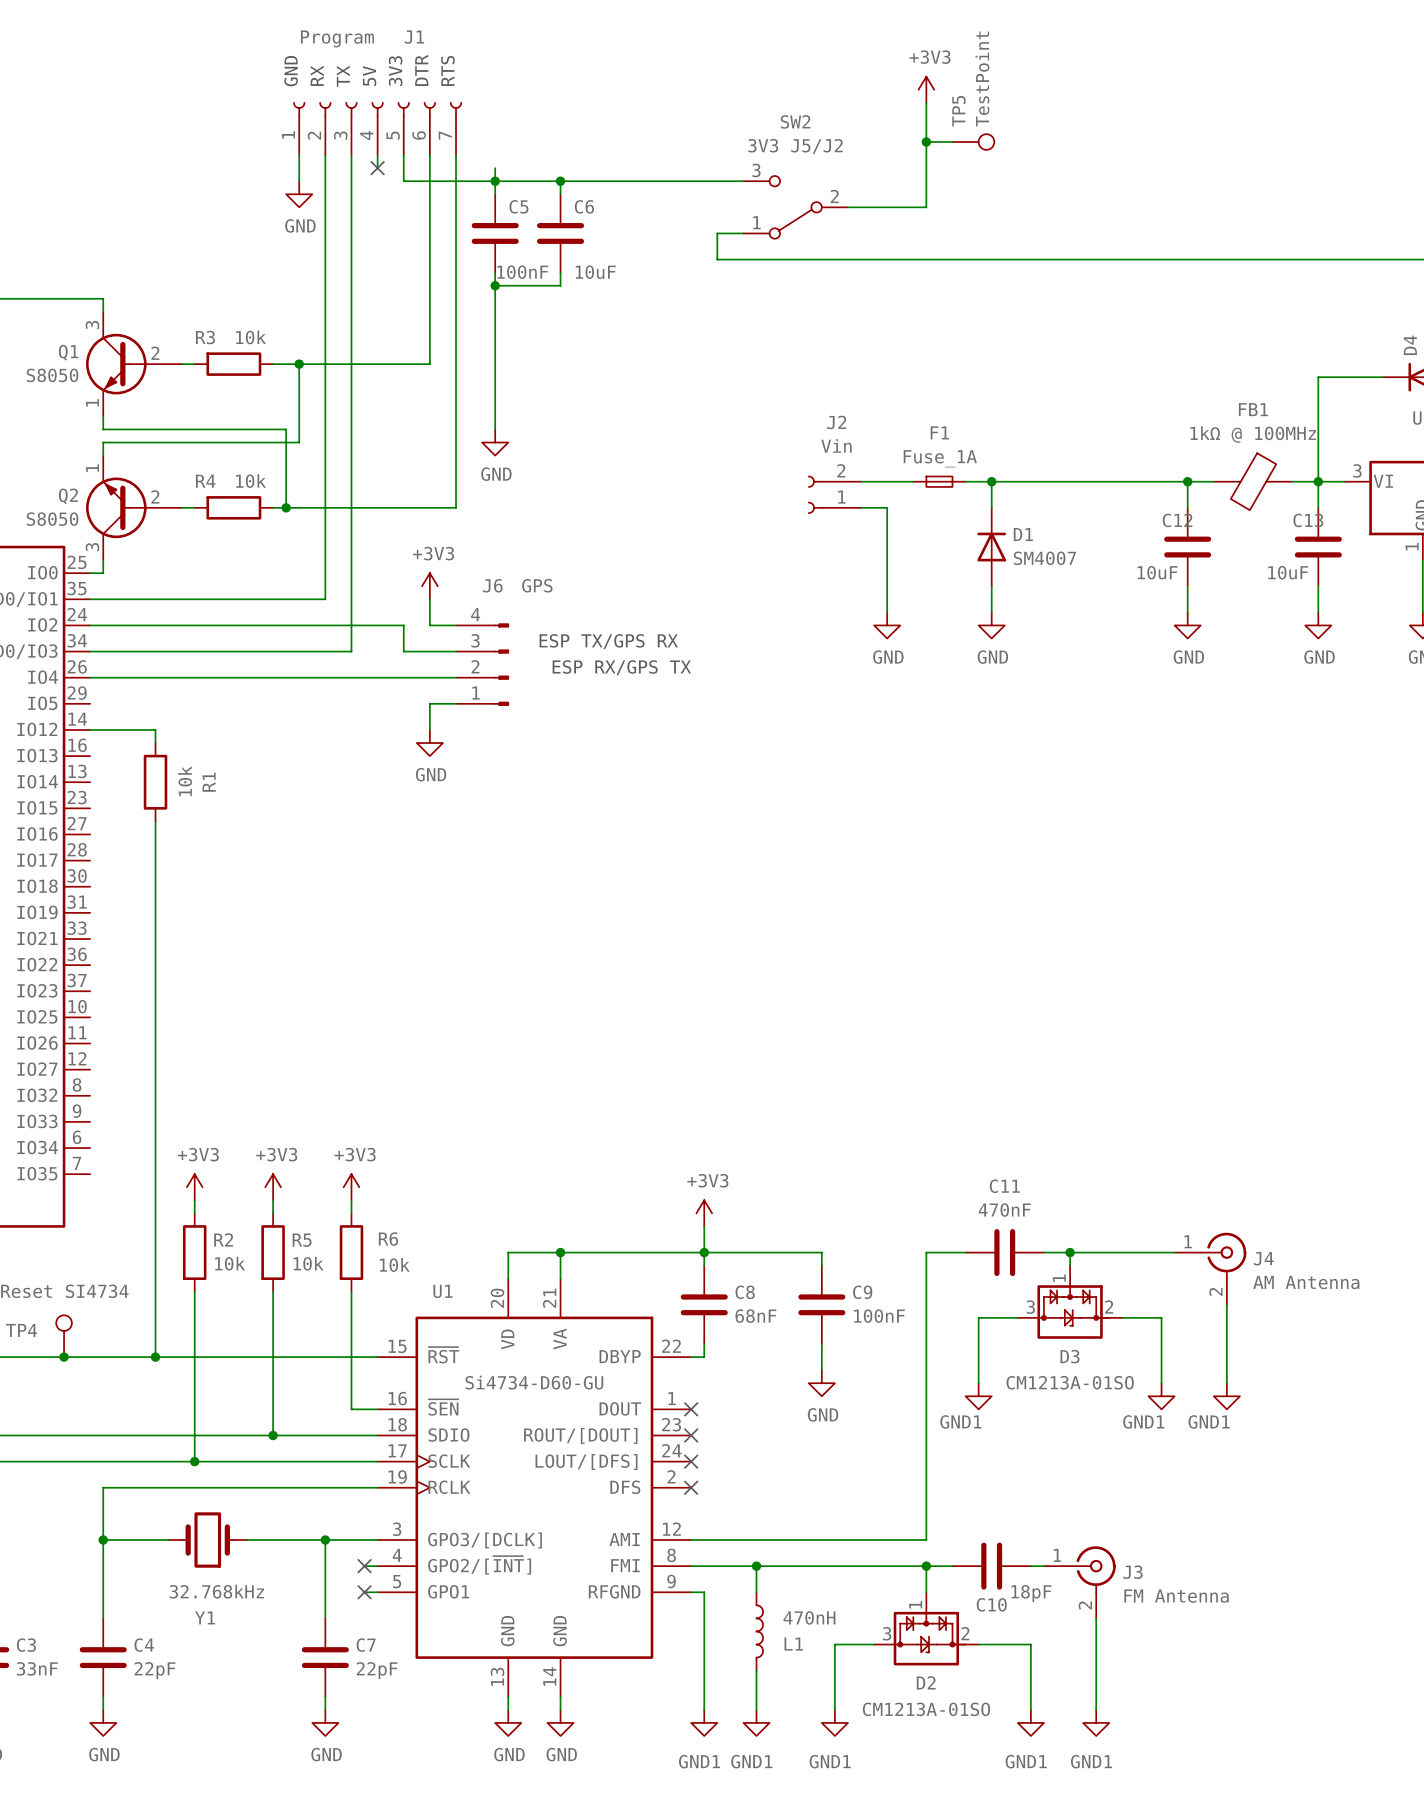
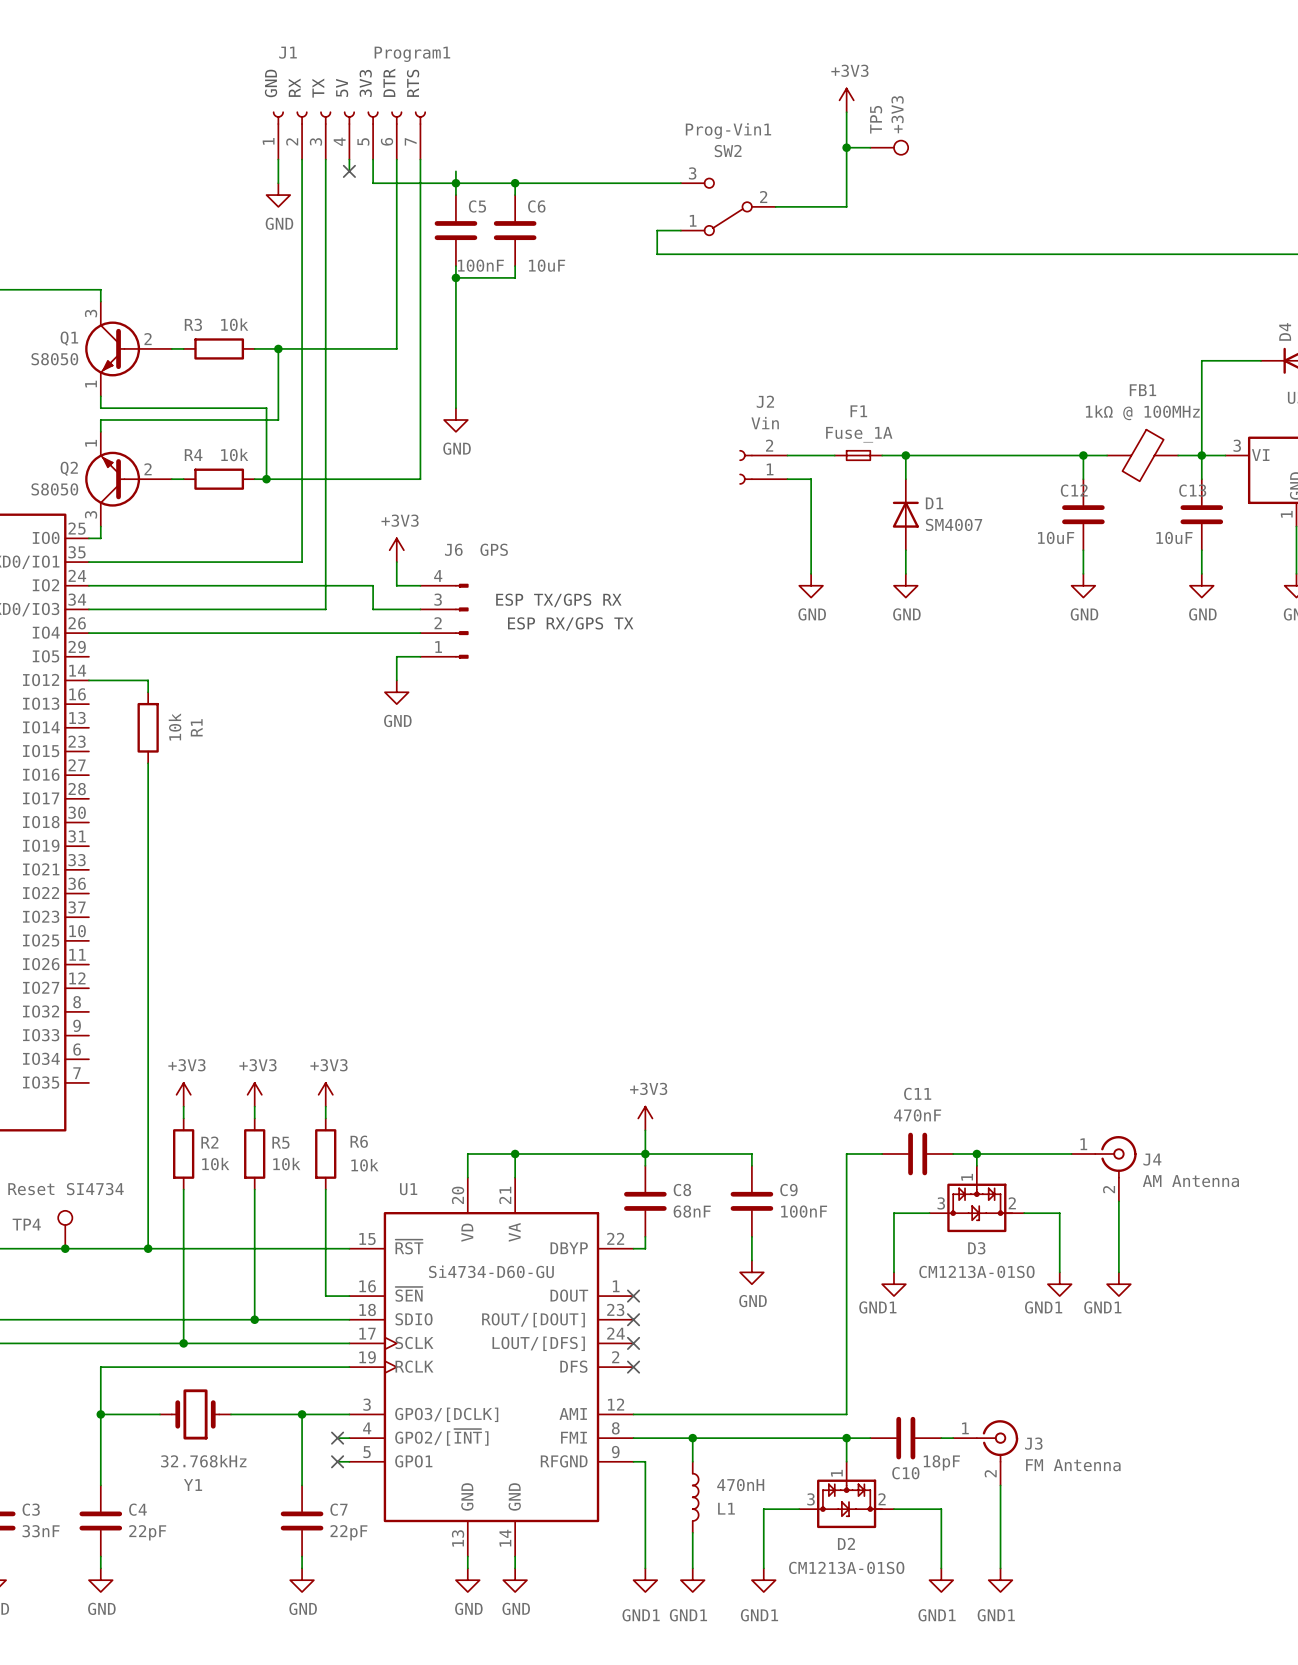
J1 name: J1 (414, 37) -> Program1 (412, 54)
J1 value: Program (337, 38) -> J1 (288, 52)
TP5 value: TestPoint (982, 78) -> +3V3 (897, 114)
SW2 name: SW2 (795, 121) -> Prog-Vin1 (728, 131)
SW2 value: 3V3 J5/J2 (795, 146) -> SW2 (728, 151)

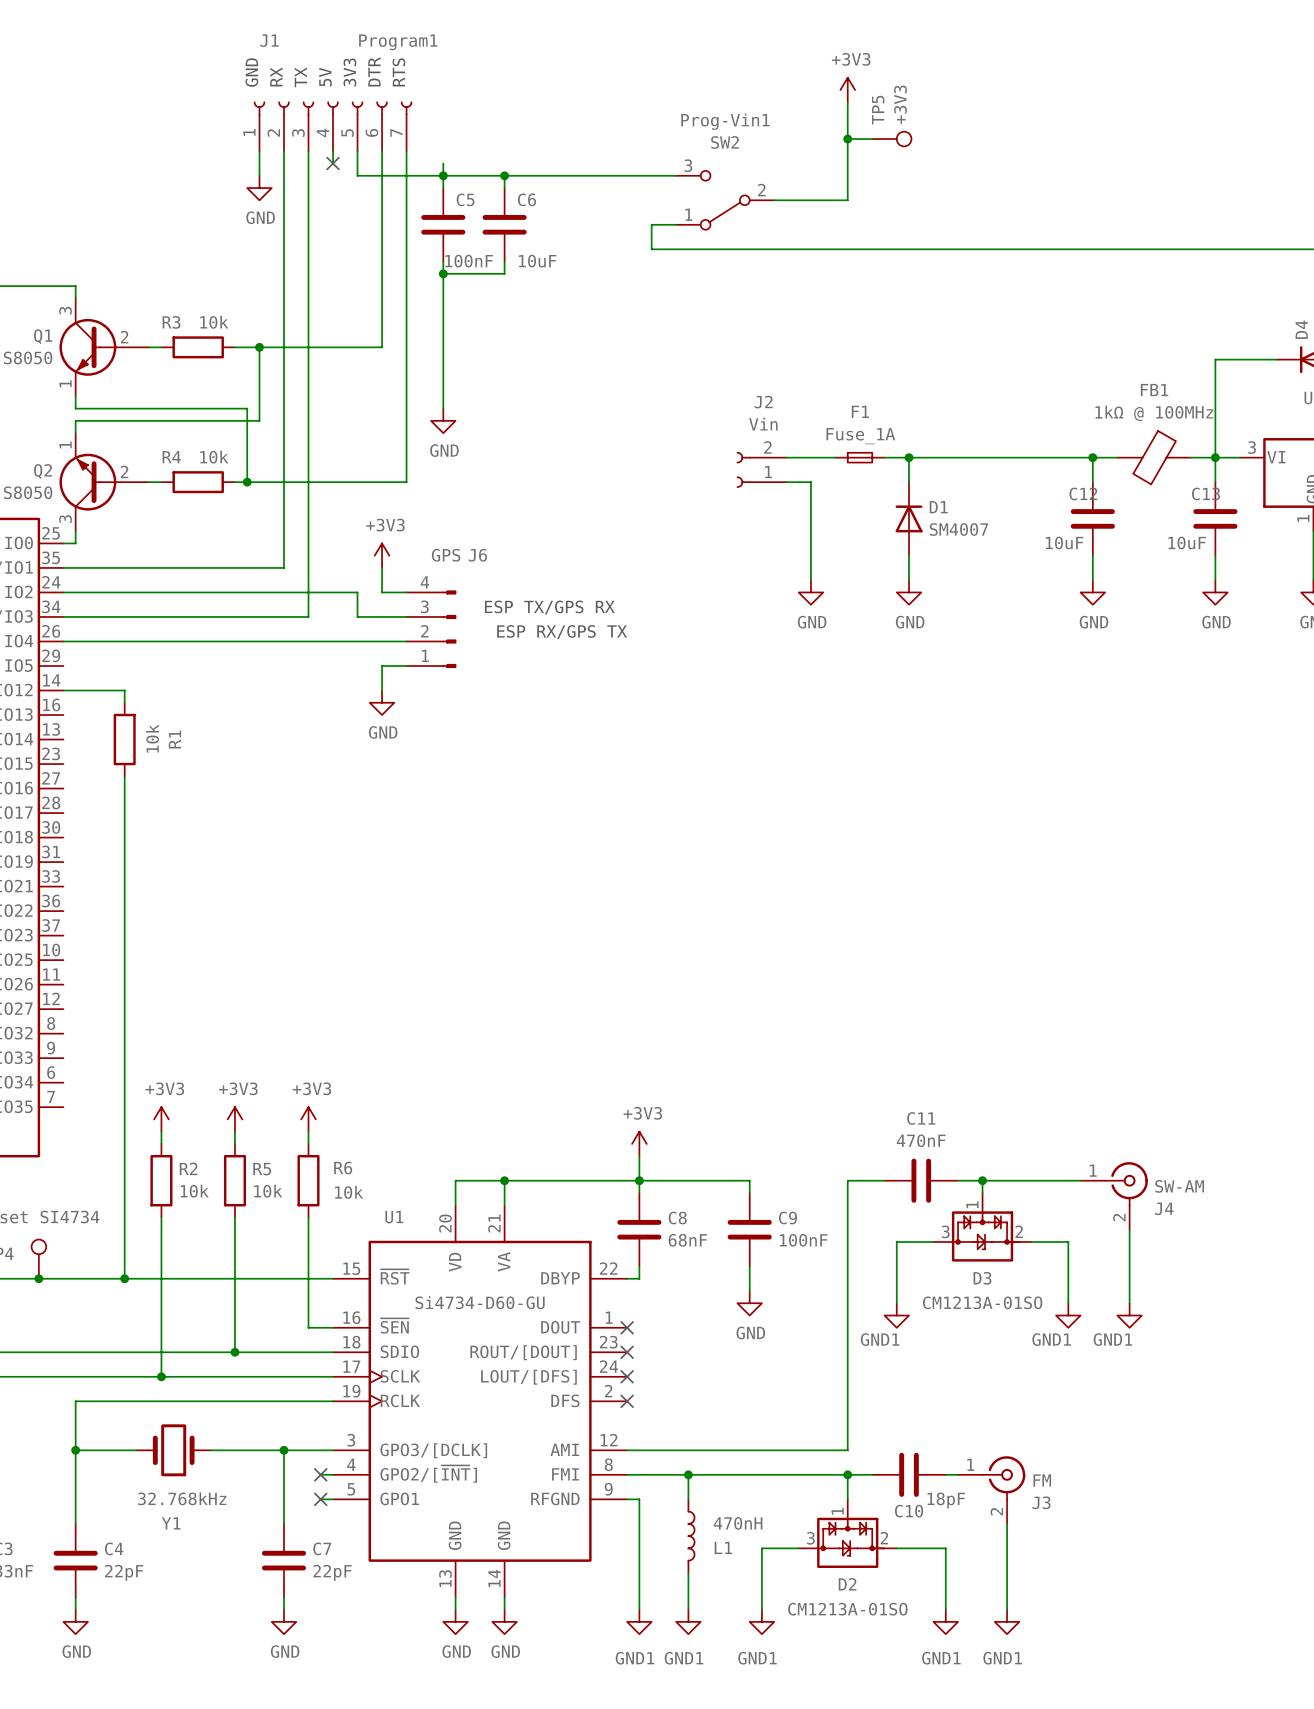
J6 name: J6 (453, 549) -> GPS (446, 555)
J6 value: GPS (494, 549) -> J6 (477, 555)
J4 name: J4 (1152, 1159) -> SW-AM (1179, 1186)
J4 value: AM Antenna (1190, 1181) -> J4 (1164, 1208)
J3 name: J3 (1033, 1443) -> FM (1042, 1480)
J3 value: FM Antenna (1073, 1465) -> J3 (1041, 1502)

